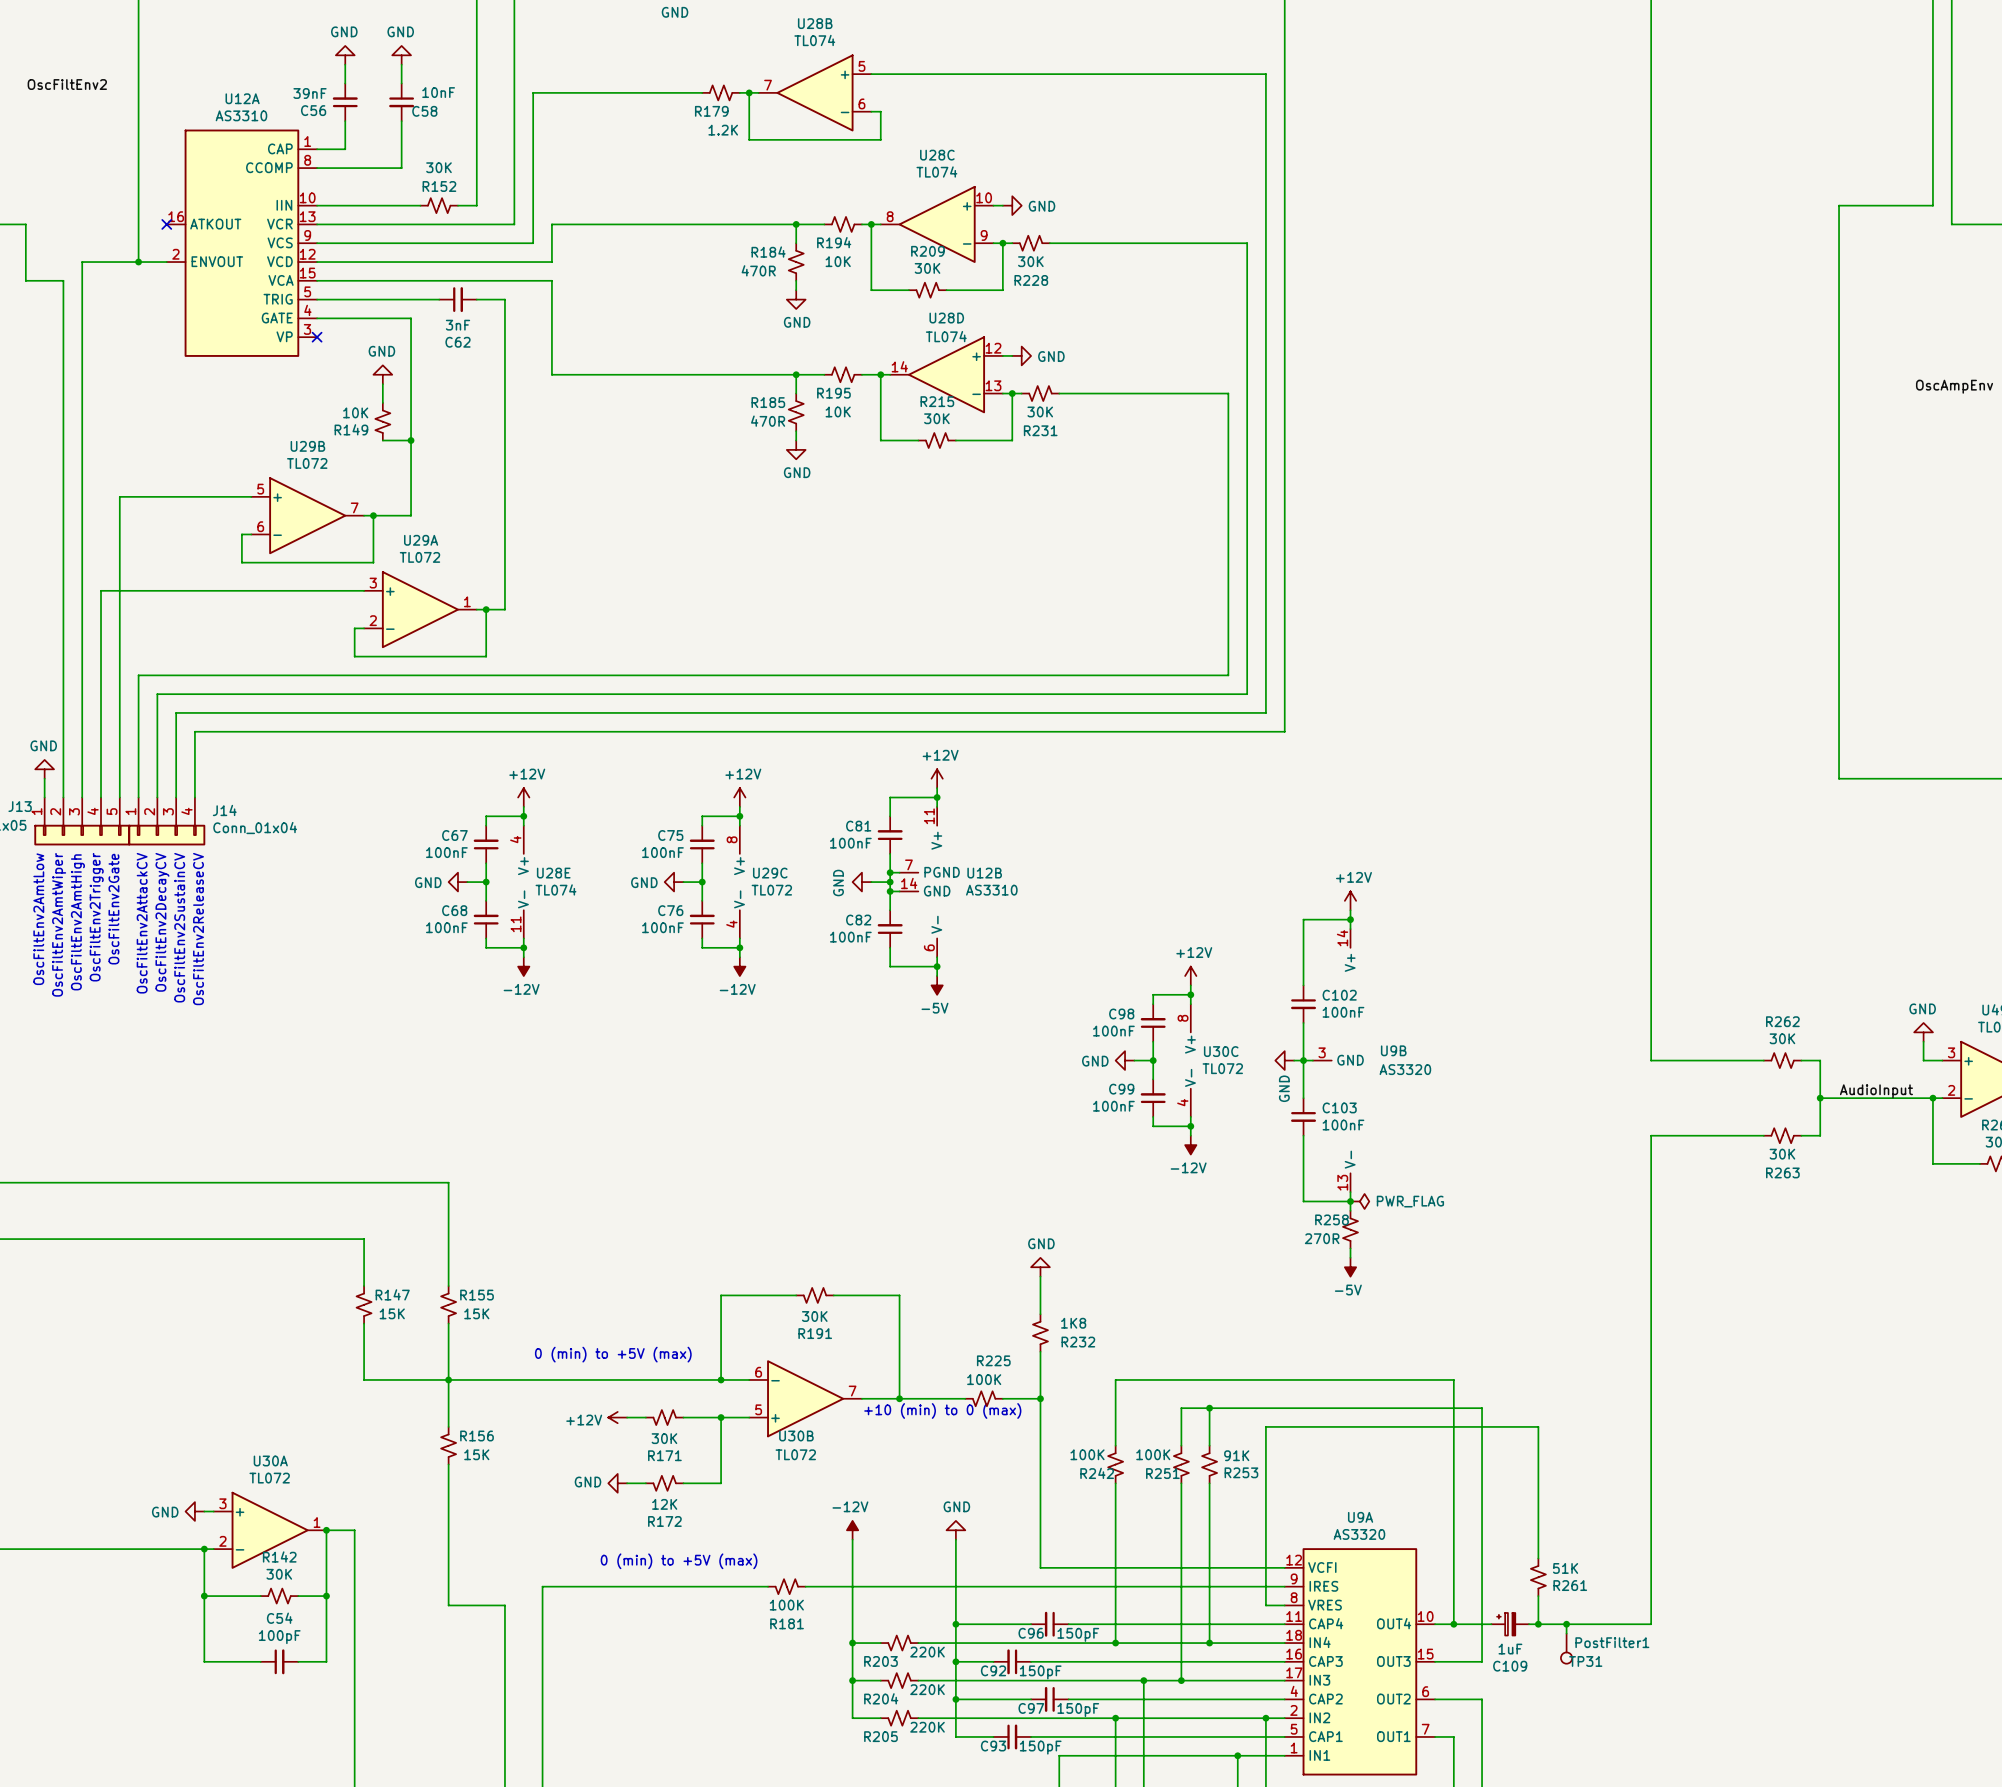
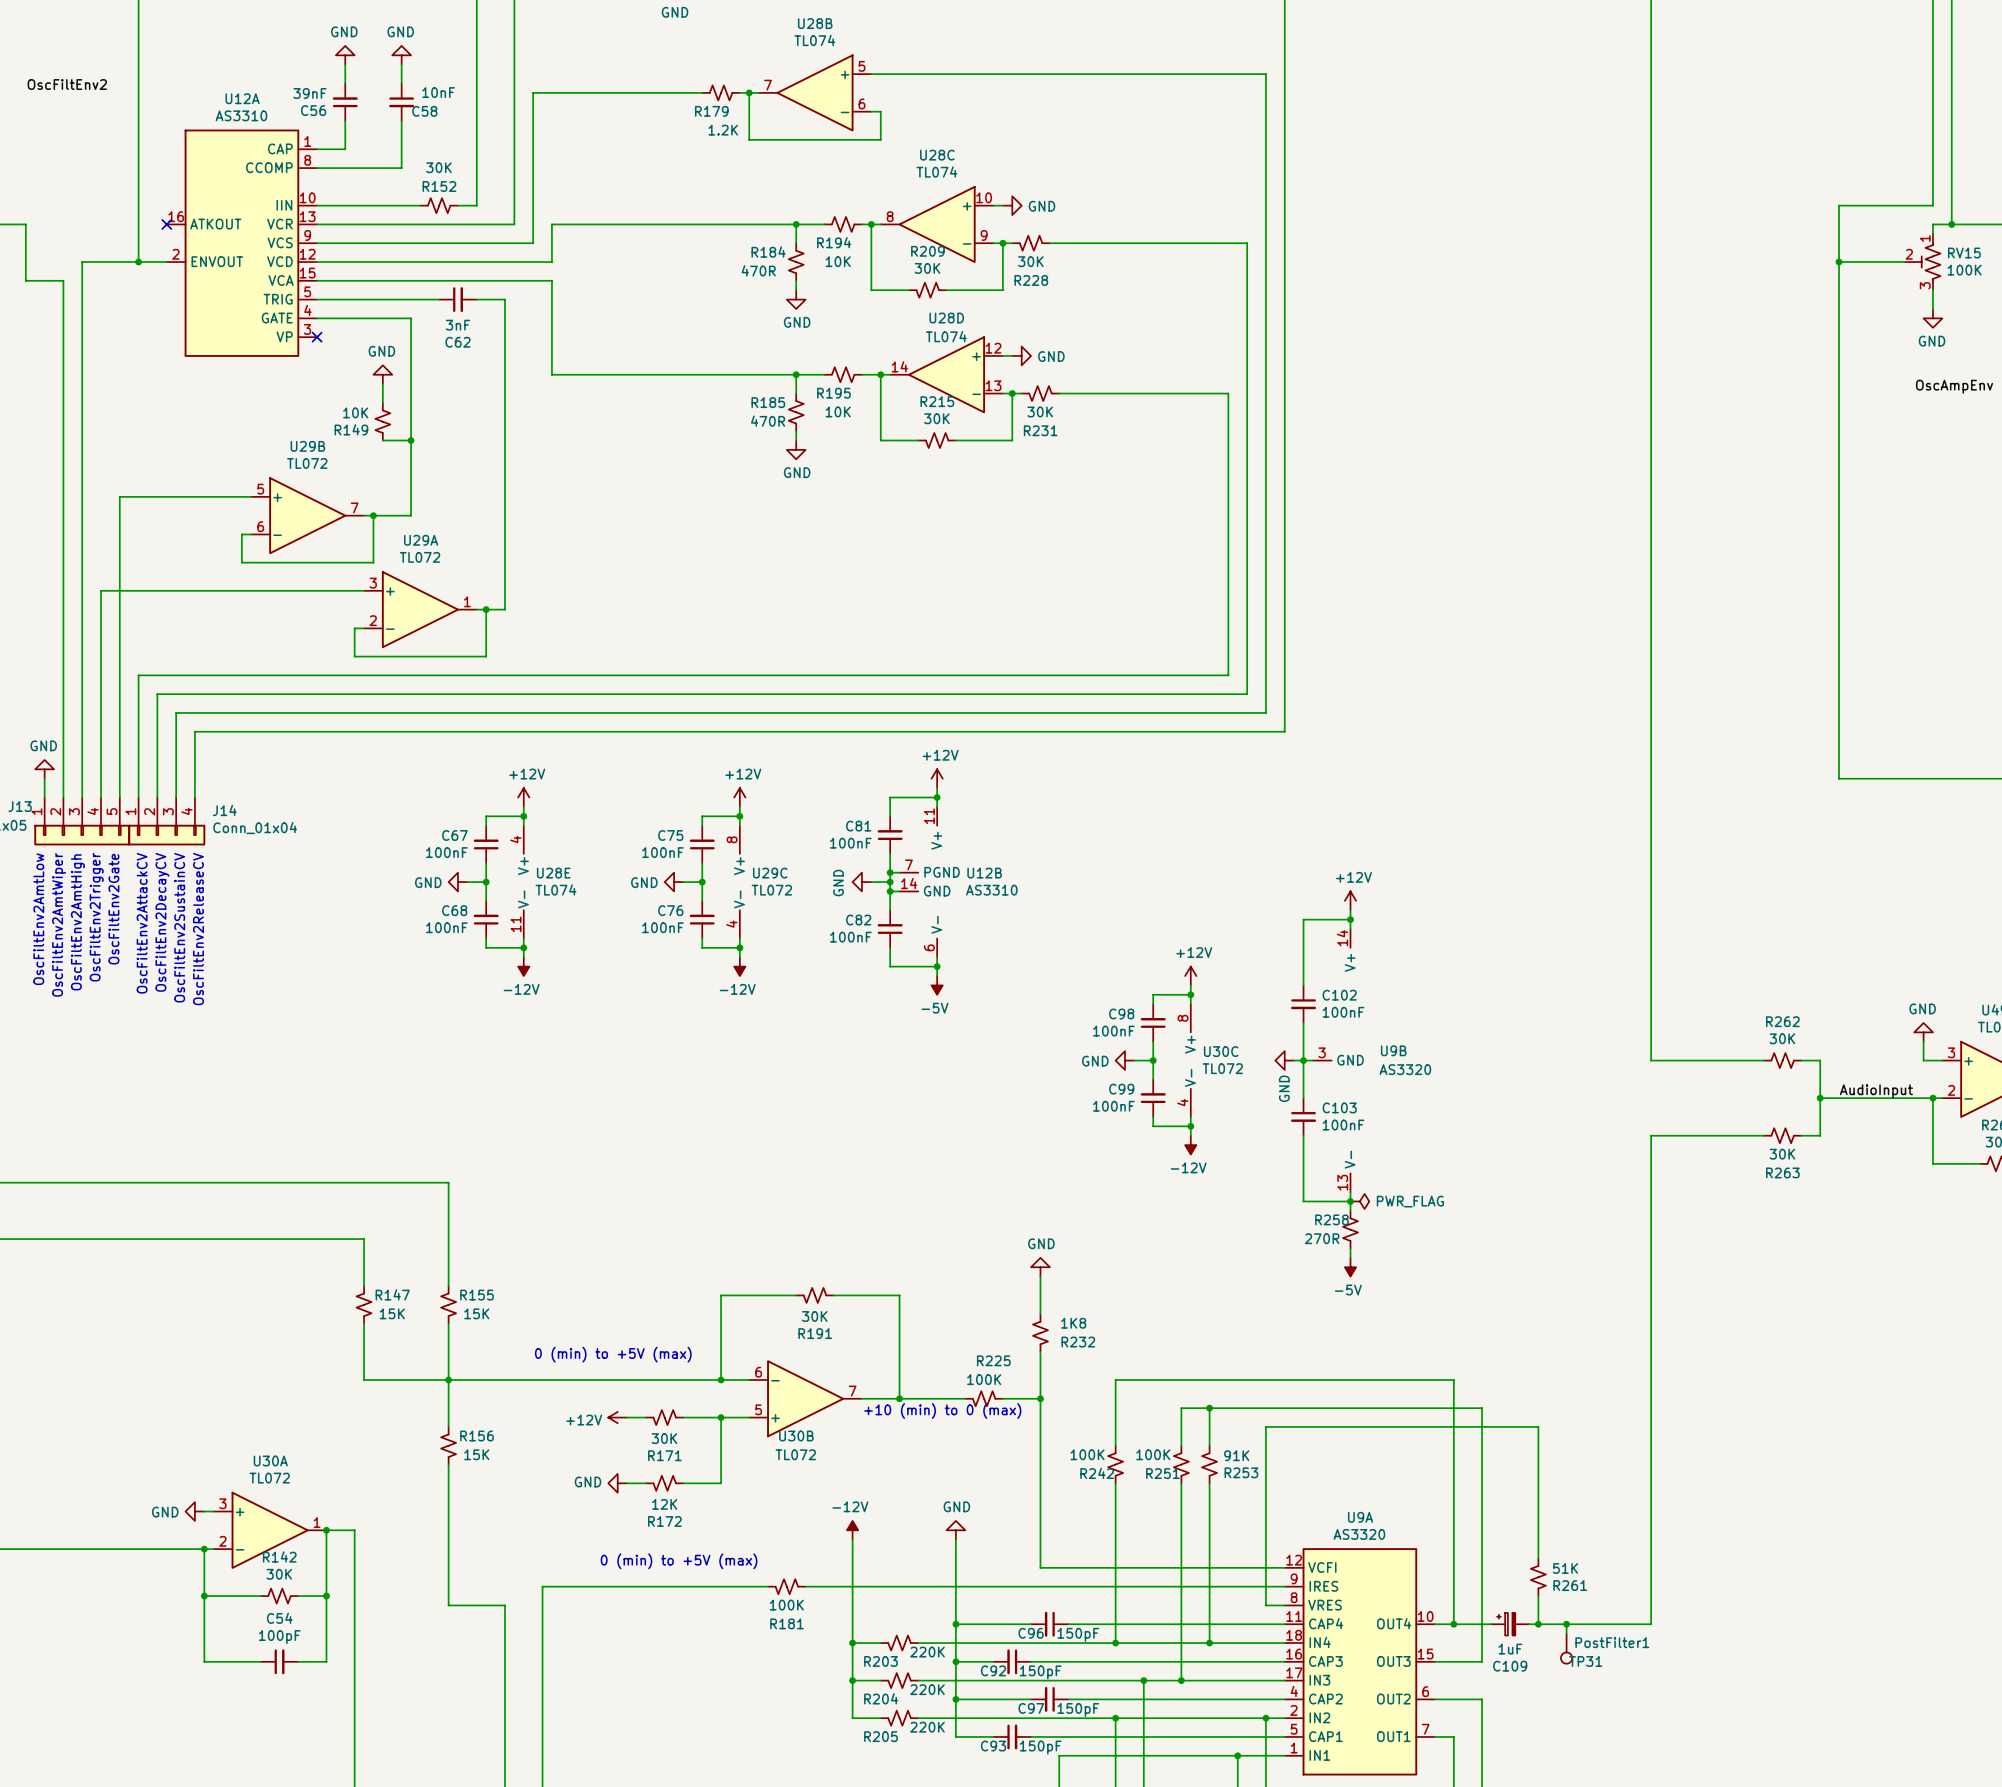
wire: none -> (1951, 224) (1932, 224) (1932, 233)
junction: none -> (1951, 224)
wire: none -> (1839, 262) (1904, 262)
junction: none -> (1839, 262)
RV15: none -> 100K (1922, 262)
wire: none -> (1932, 290) (1932, 308)
power symbol: none -> GND (1932, 318)

